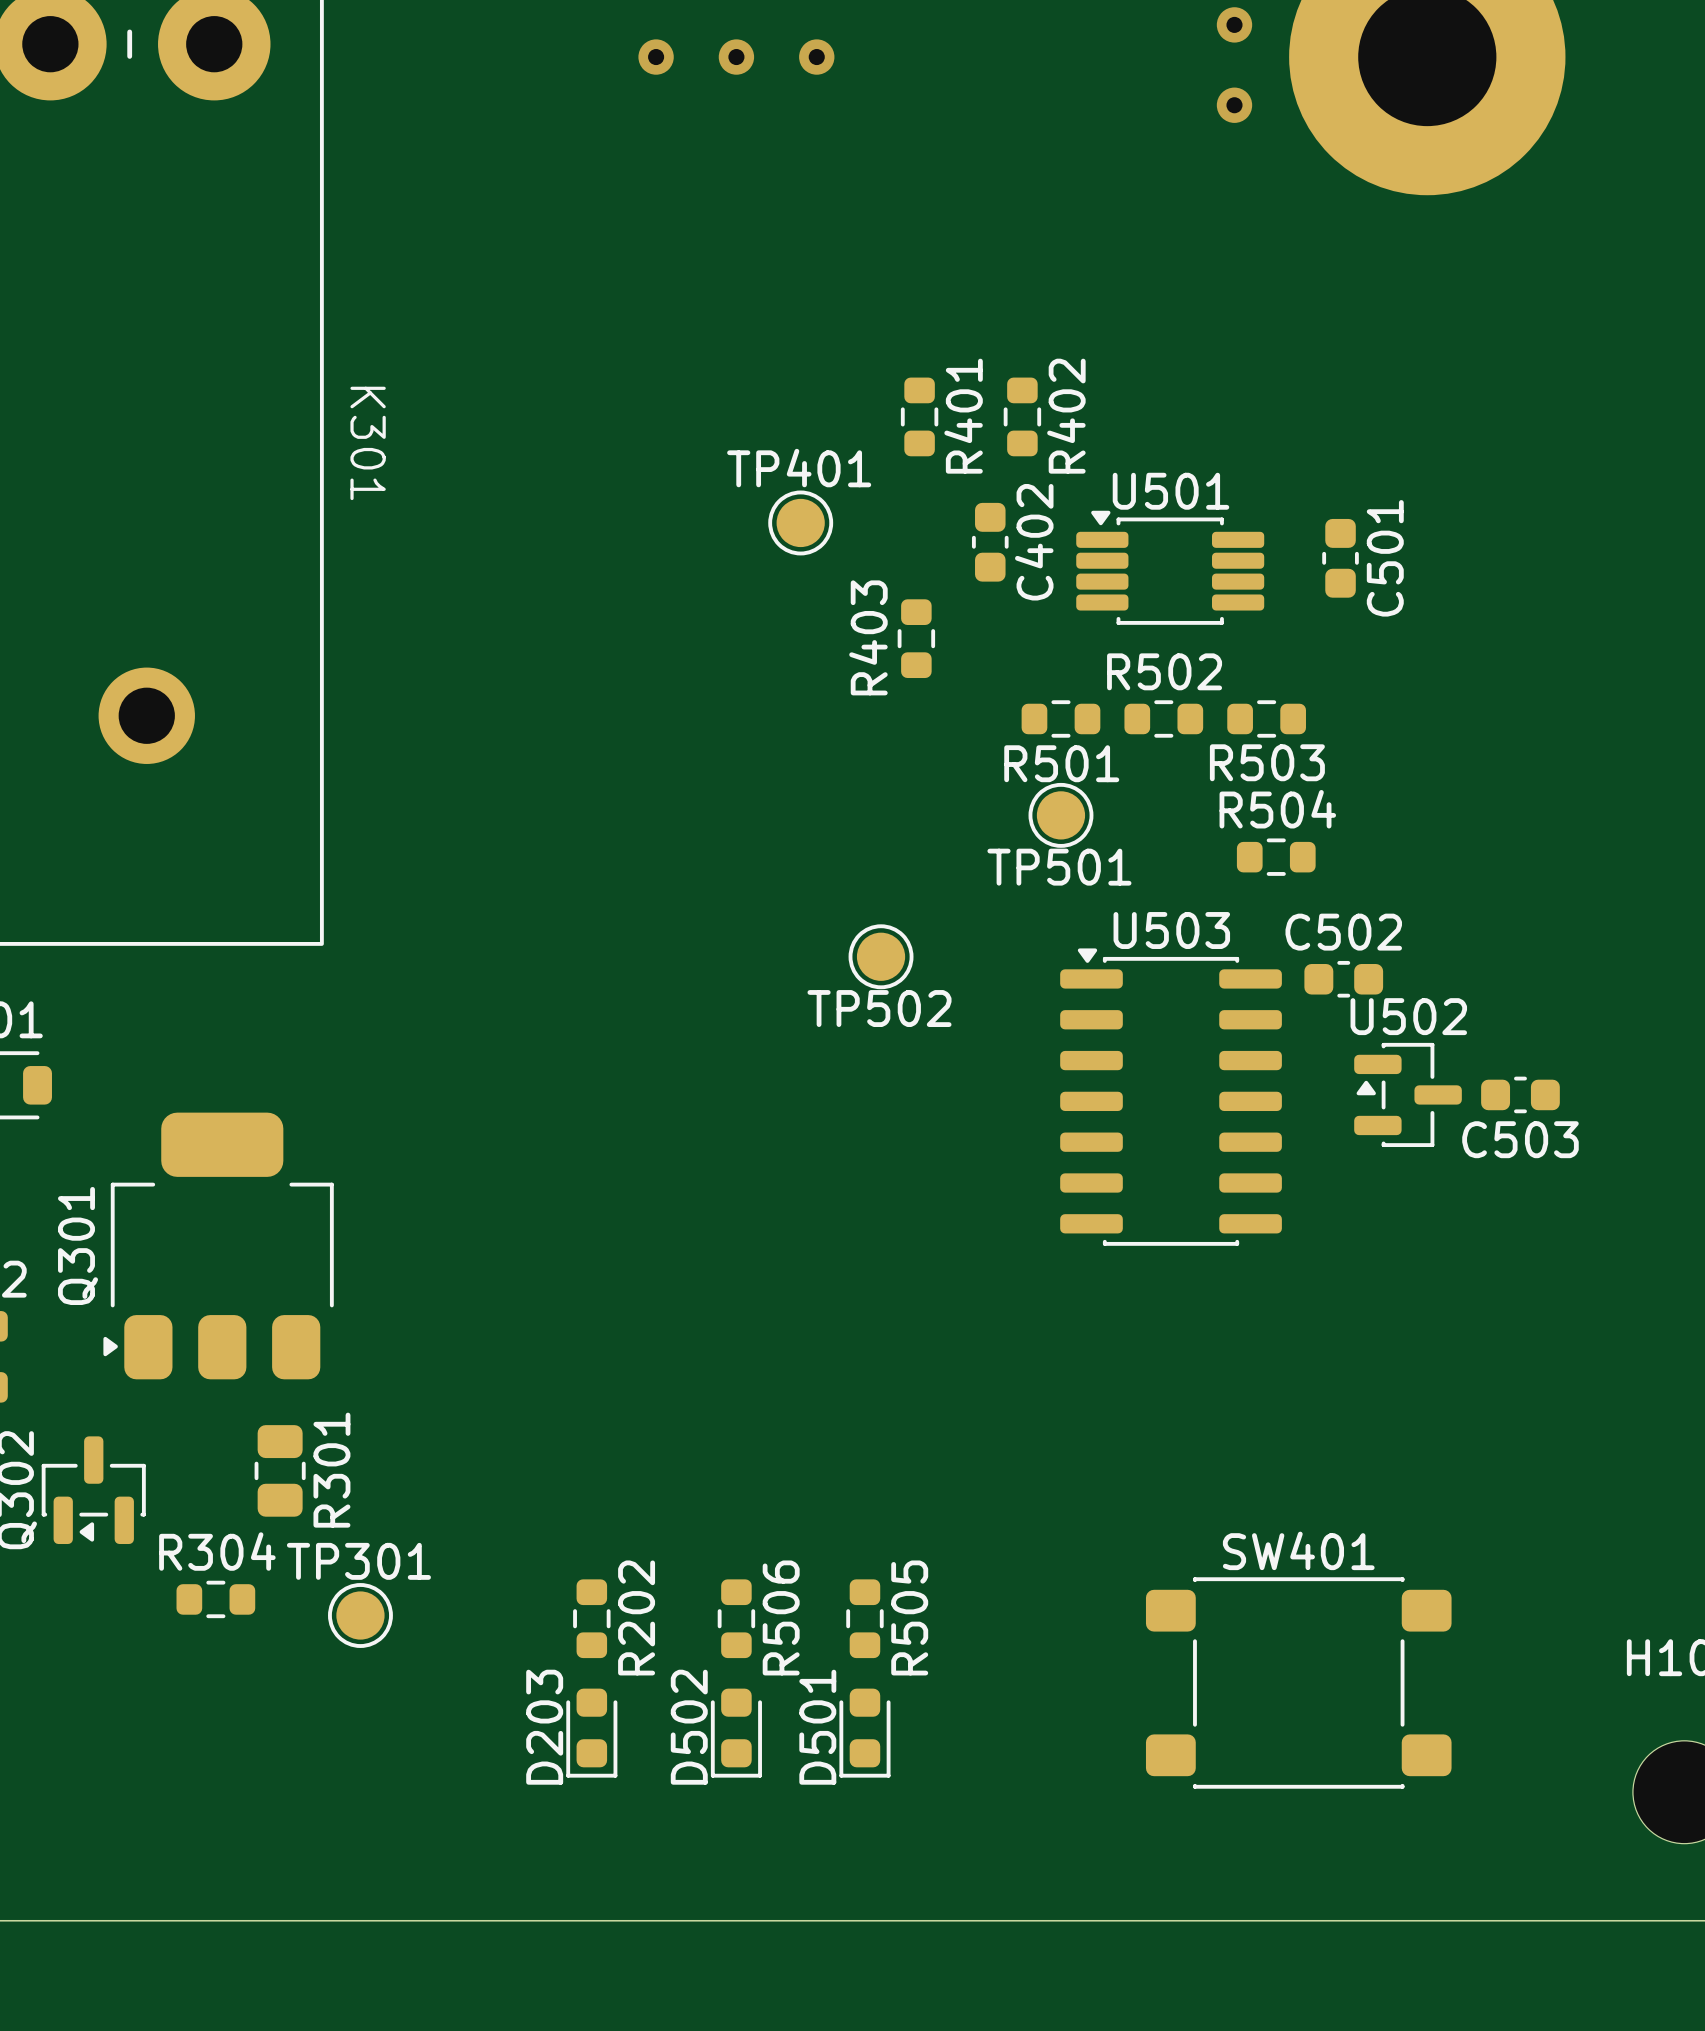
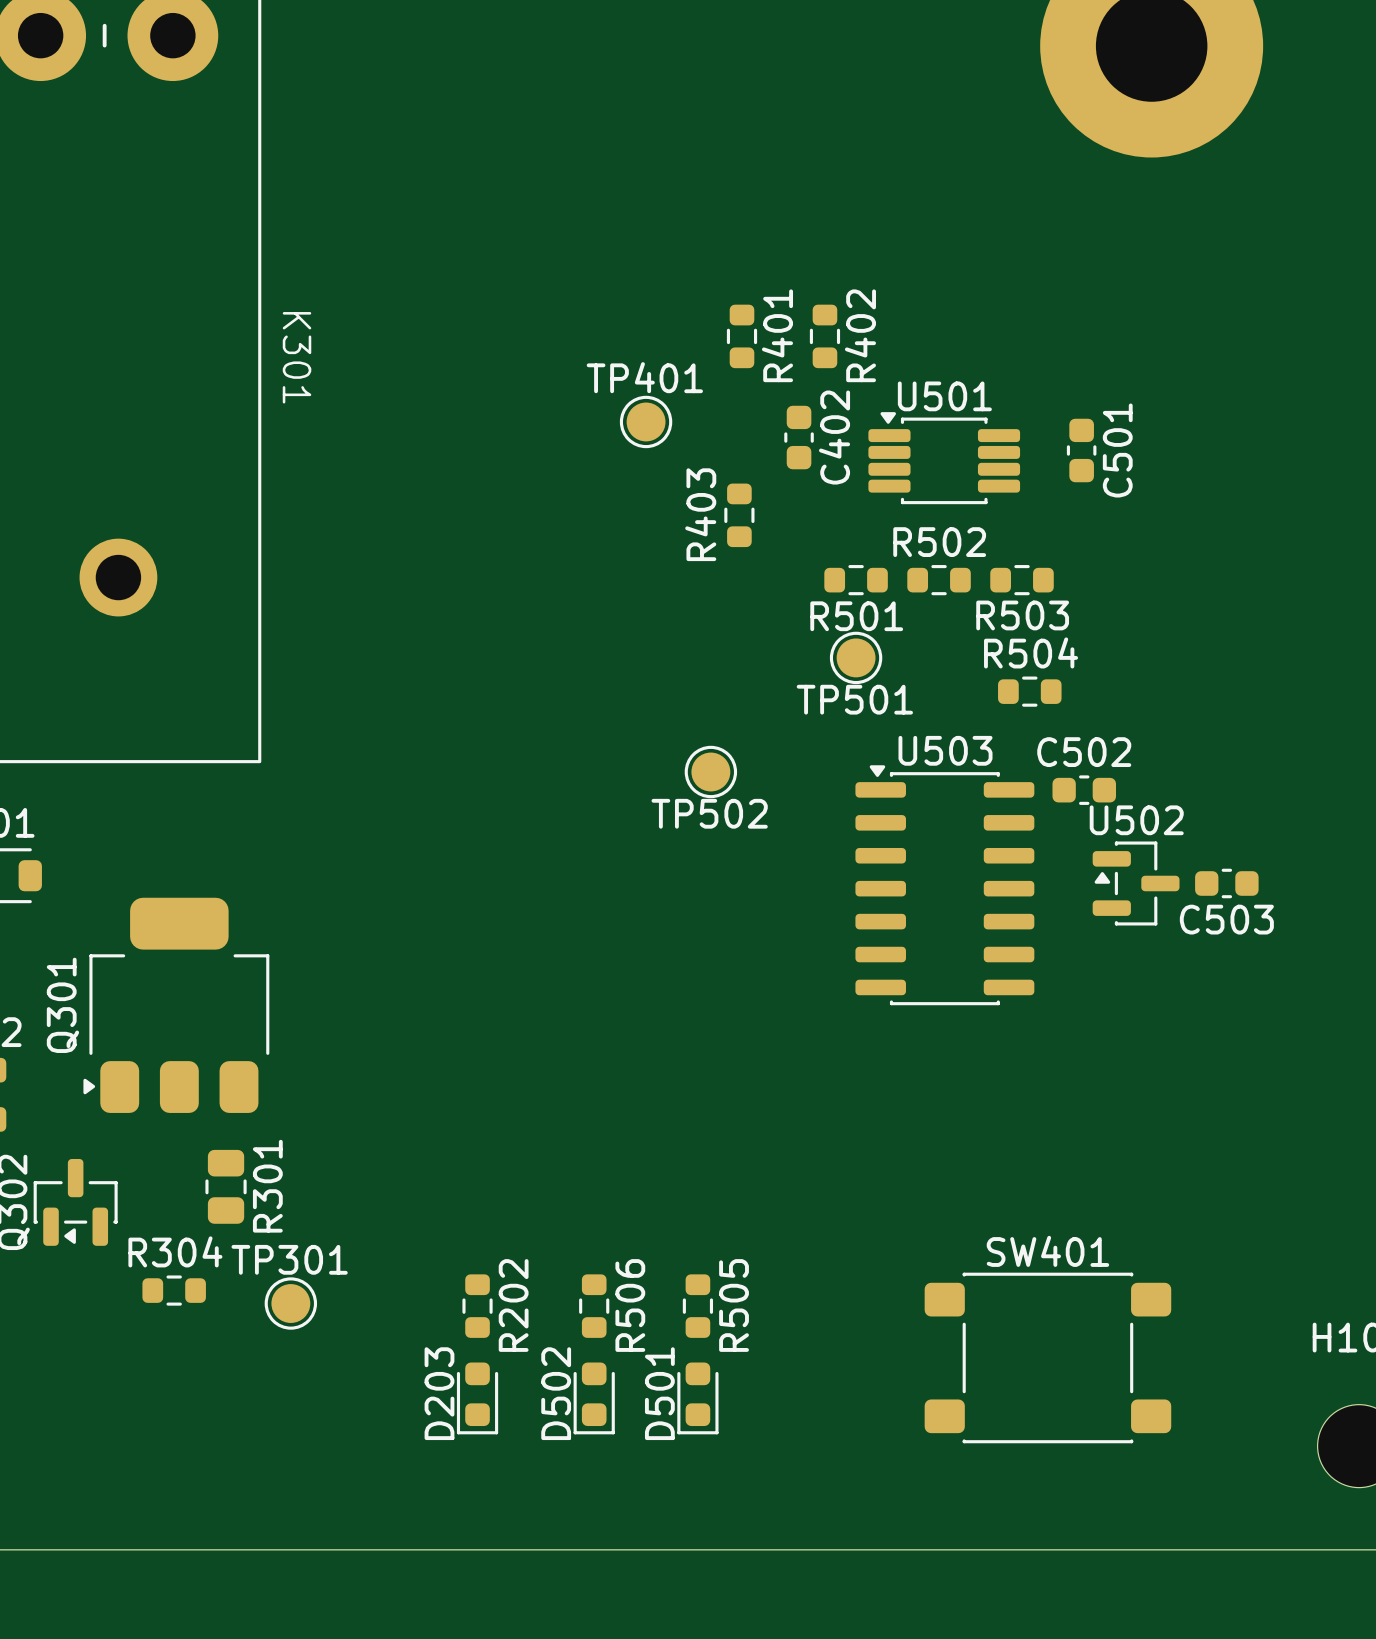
via: (1234, 24) -> none
via: (656, 57) -> none
via: (736, 57) -> none
via: (816, 57) -> none
via: (1234, 105) -> none

